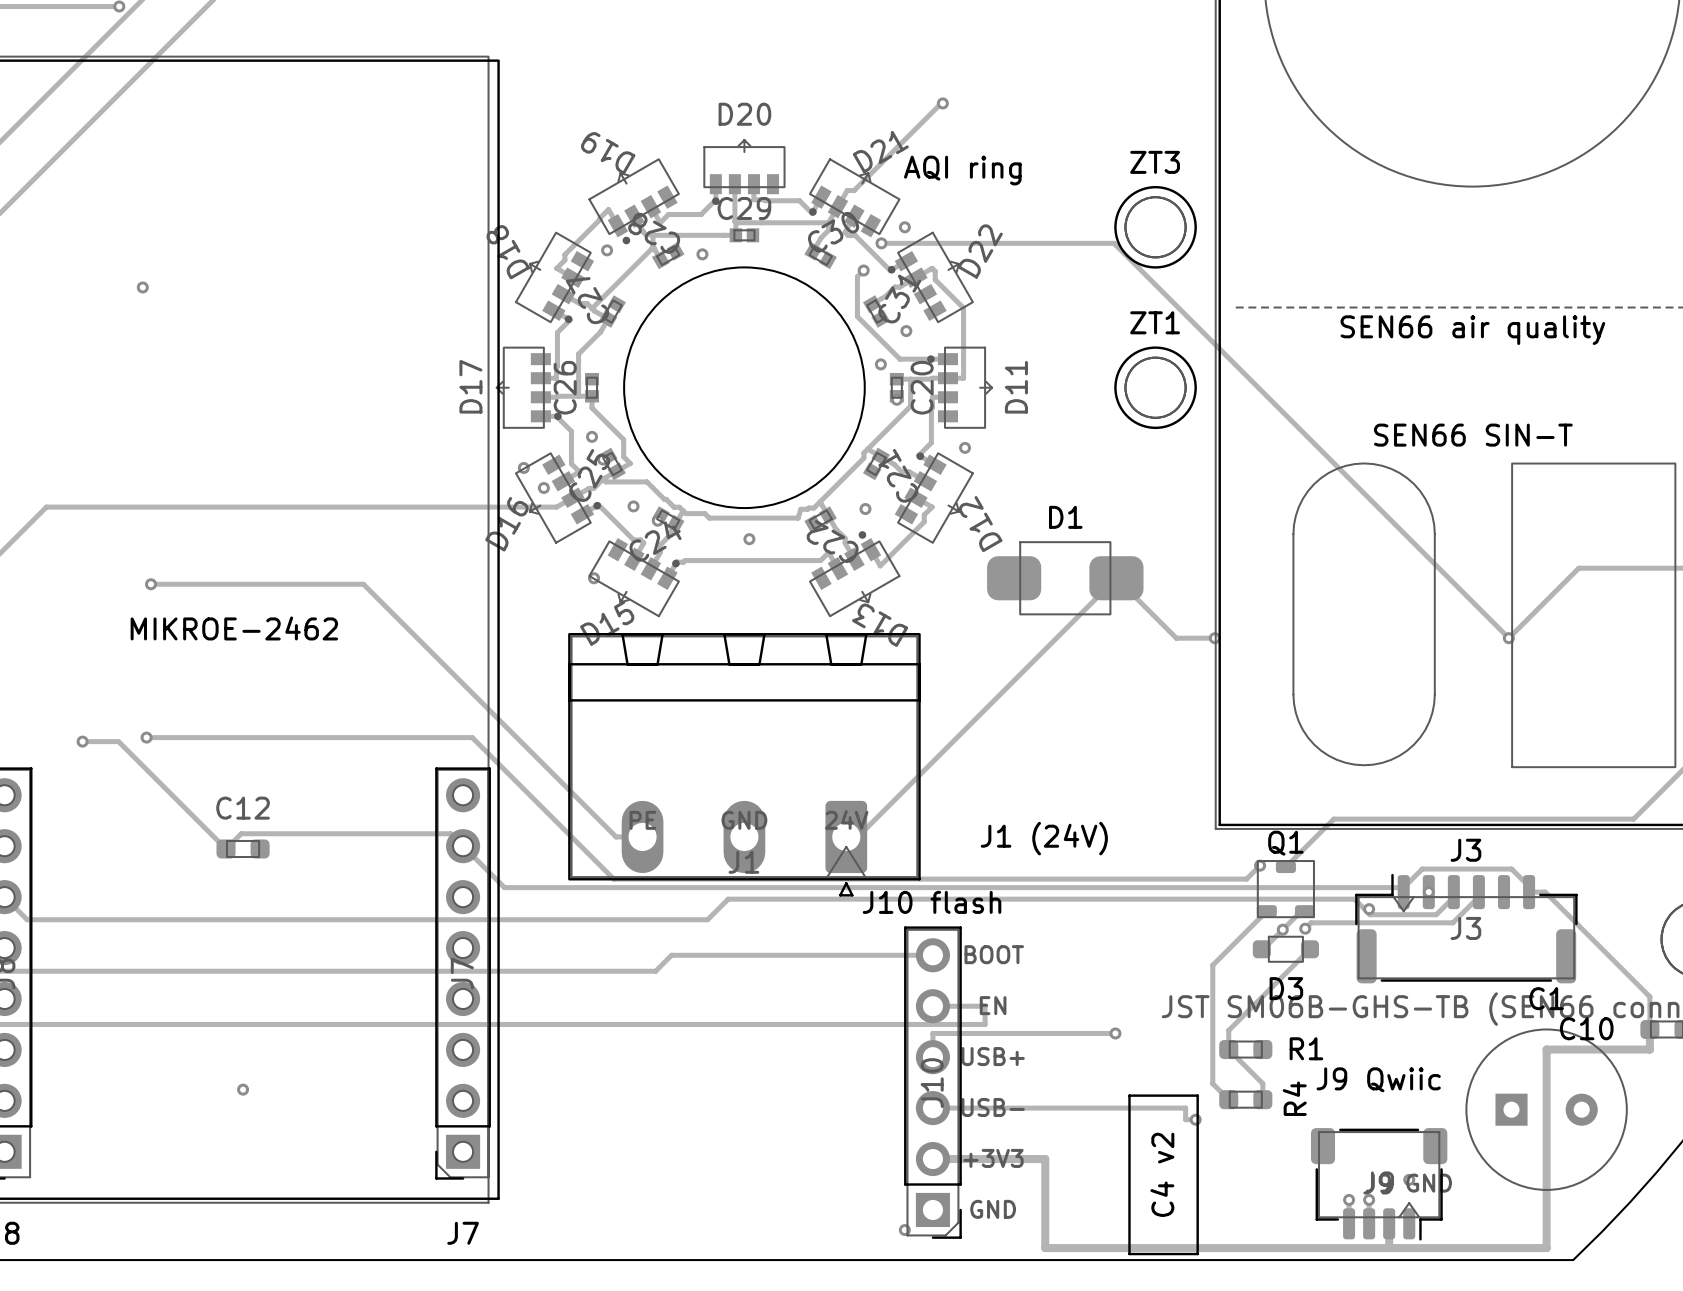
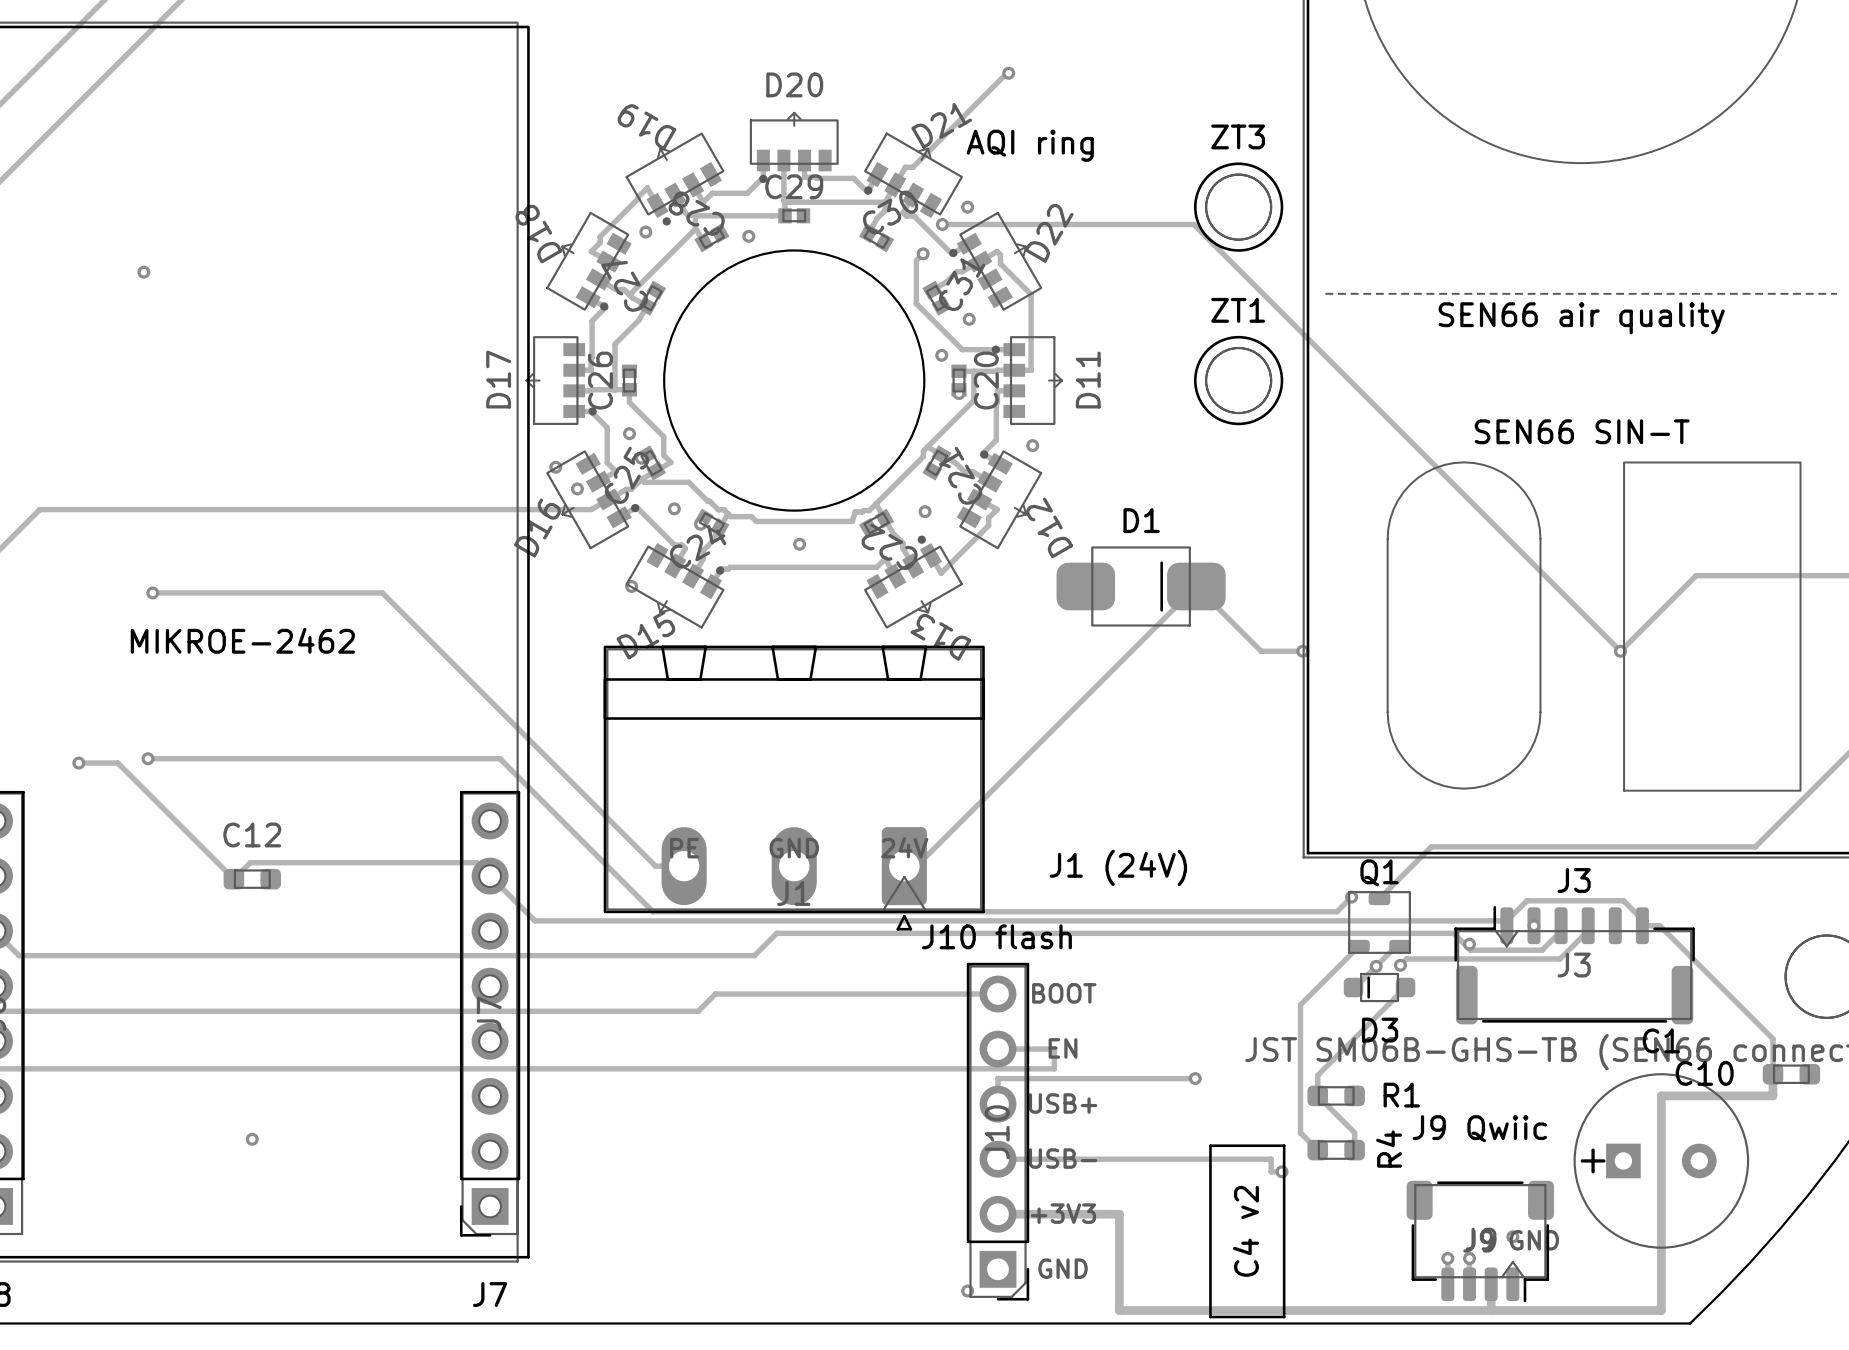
part footprint: [987, 541, 1144, 616] -> [1056, 546, 1226, 627]
part footprint: [1252, 935, 1319, 963] -> [1343, 972, 1416, 1003]
part footprint: [1465, 1028, 1628, 1191] -> [1573, 1073, 1750, 1249]

